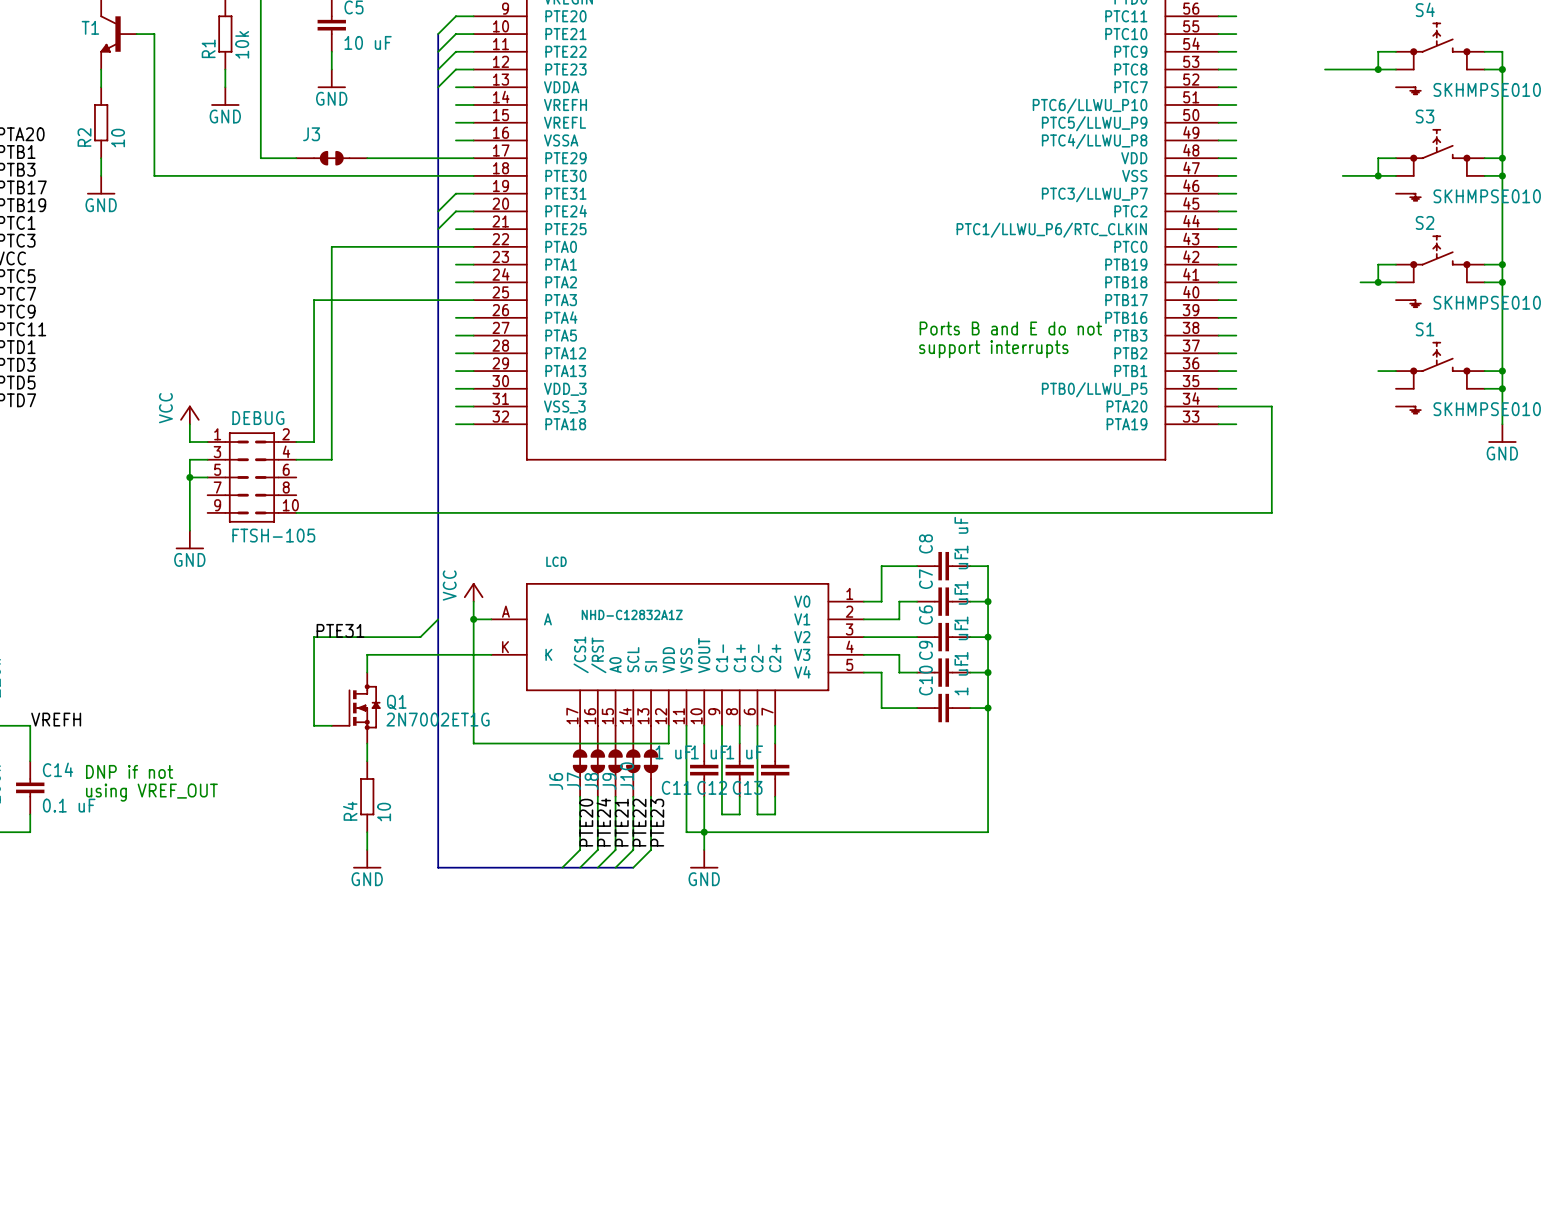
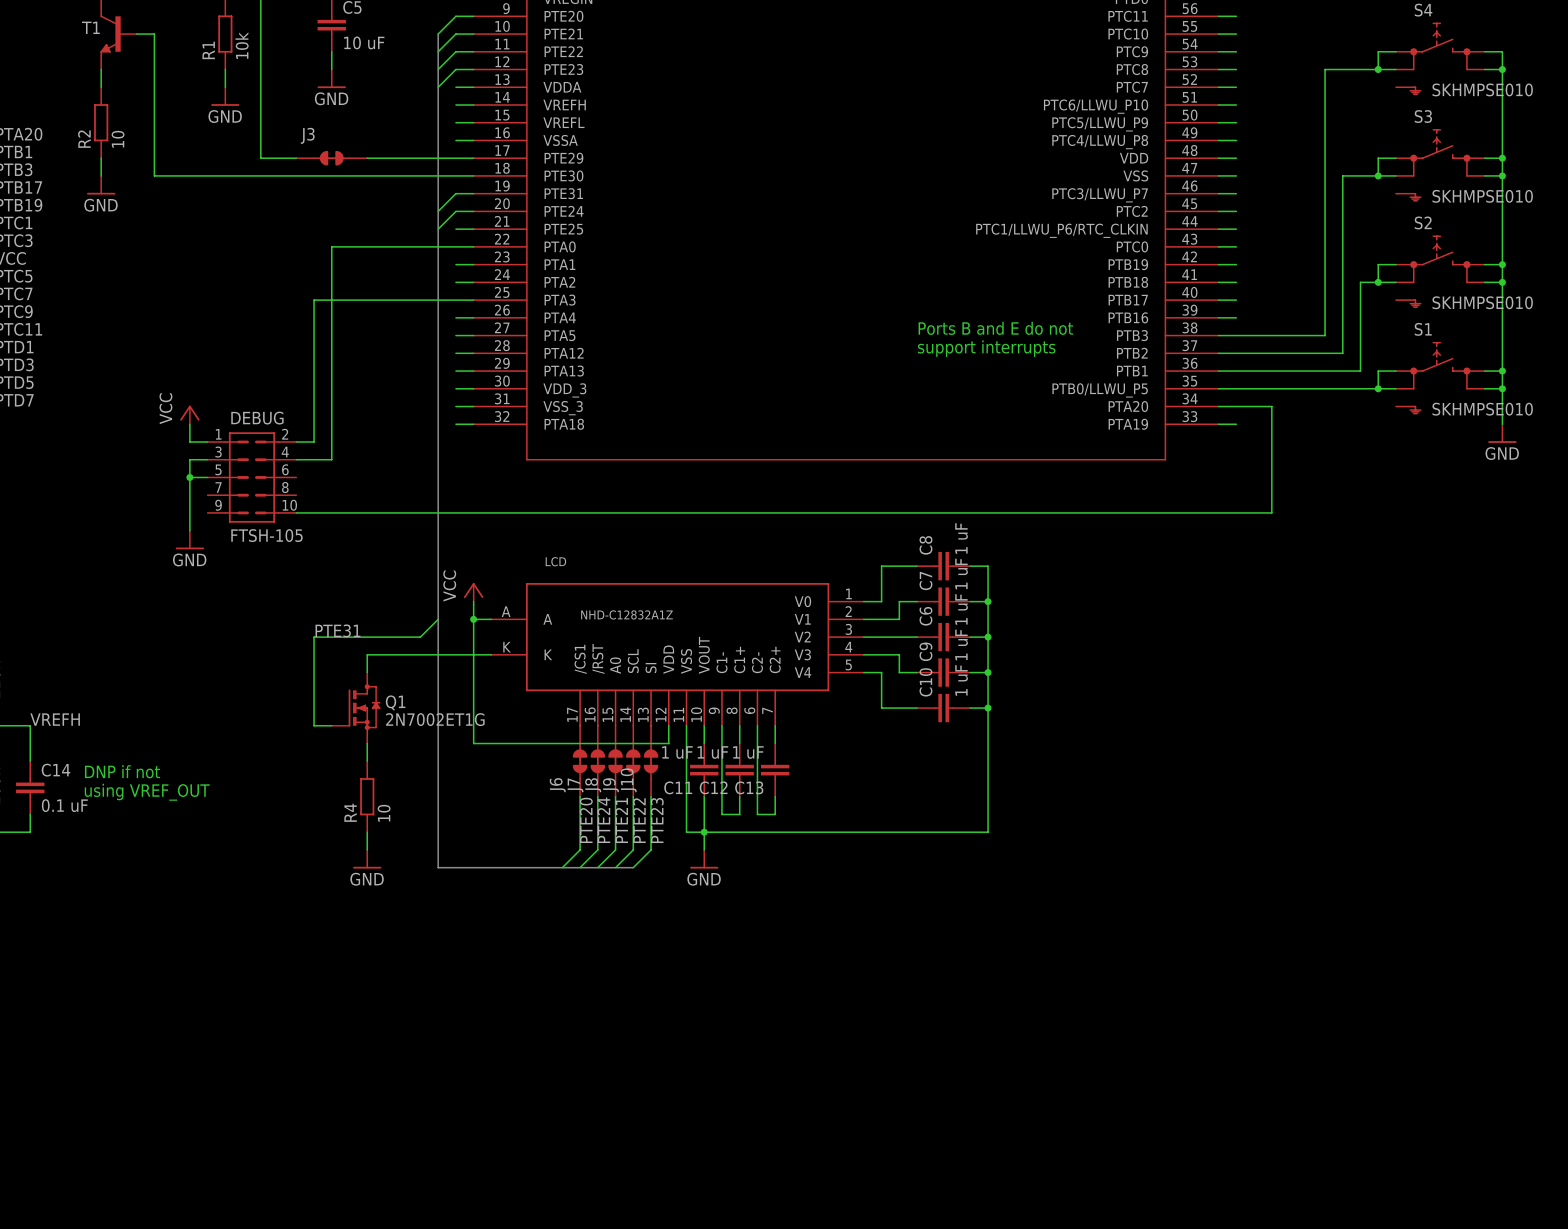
wire: none -> (1325, 69) (1325, 335) (1236, 335)
wire: none -> (1342, 175) (1342, 353) (1236, 353)
wire: none -> (1360, 282) (1360, 371) (1236, 371)
wire: none -> (1378, 371) (1378, 388)
wire: none -> (1236, 388) (1395, 388)
junction: none -> (1378, 388)

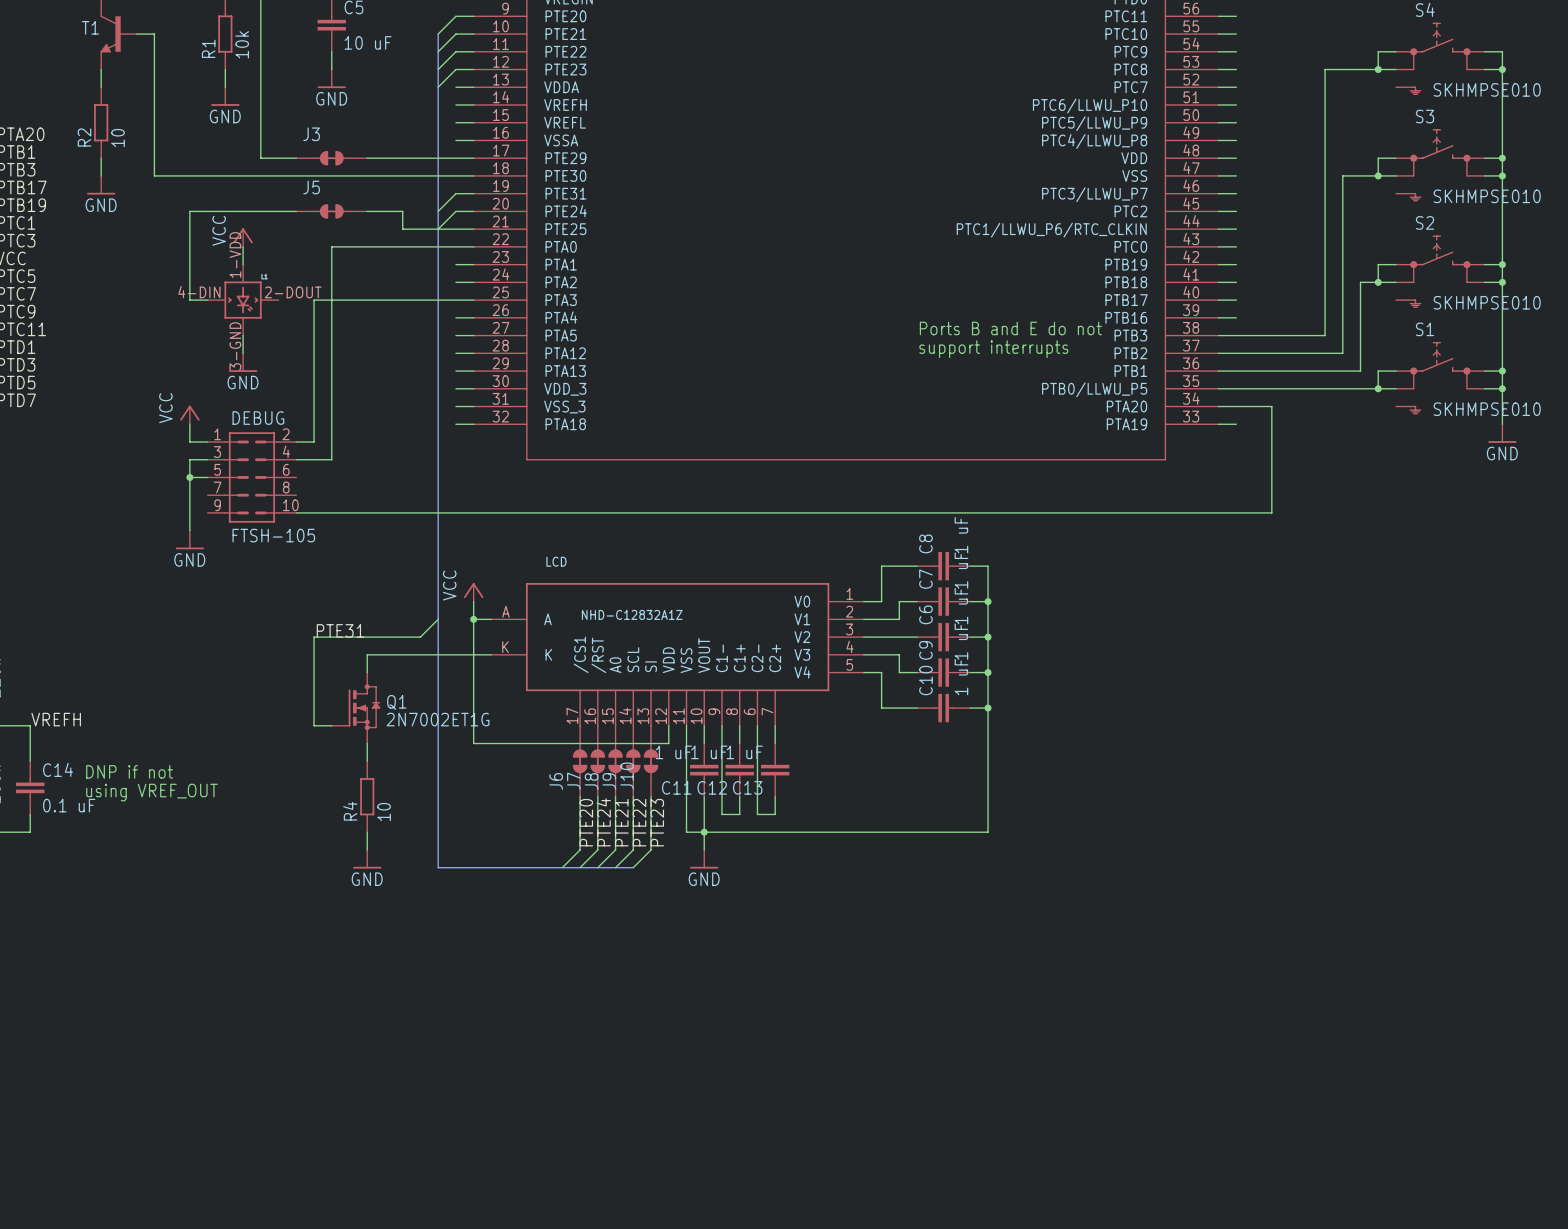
wire: none -> (296, 211) (189, 211) (189, 300) (207, 300)
J5: none -> (331, 211)
wire: none -> (367, 211) (402, 211) (402, 229) (455, 229)
power symbol: none -> VCC (243, 237)
wire: none -> (243, 246) (243, 264)
part: none -> (243, 300)
wire: none -> (243, 335) (243, 353)
power symbol: none -> GND (243, 362)

